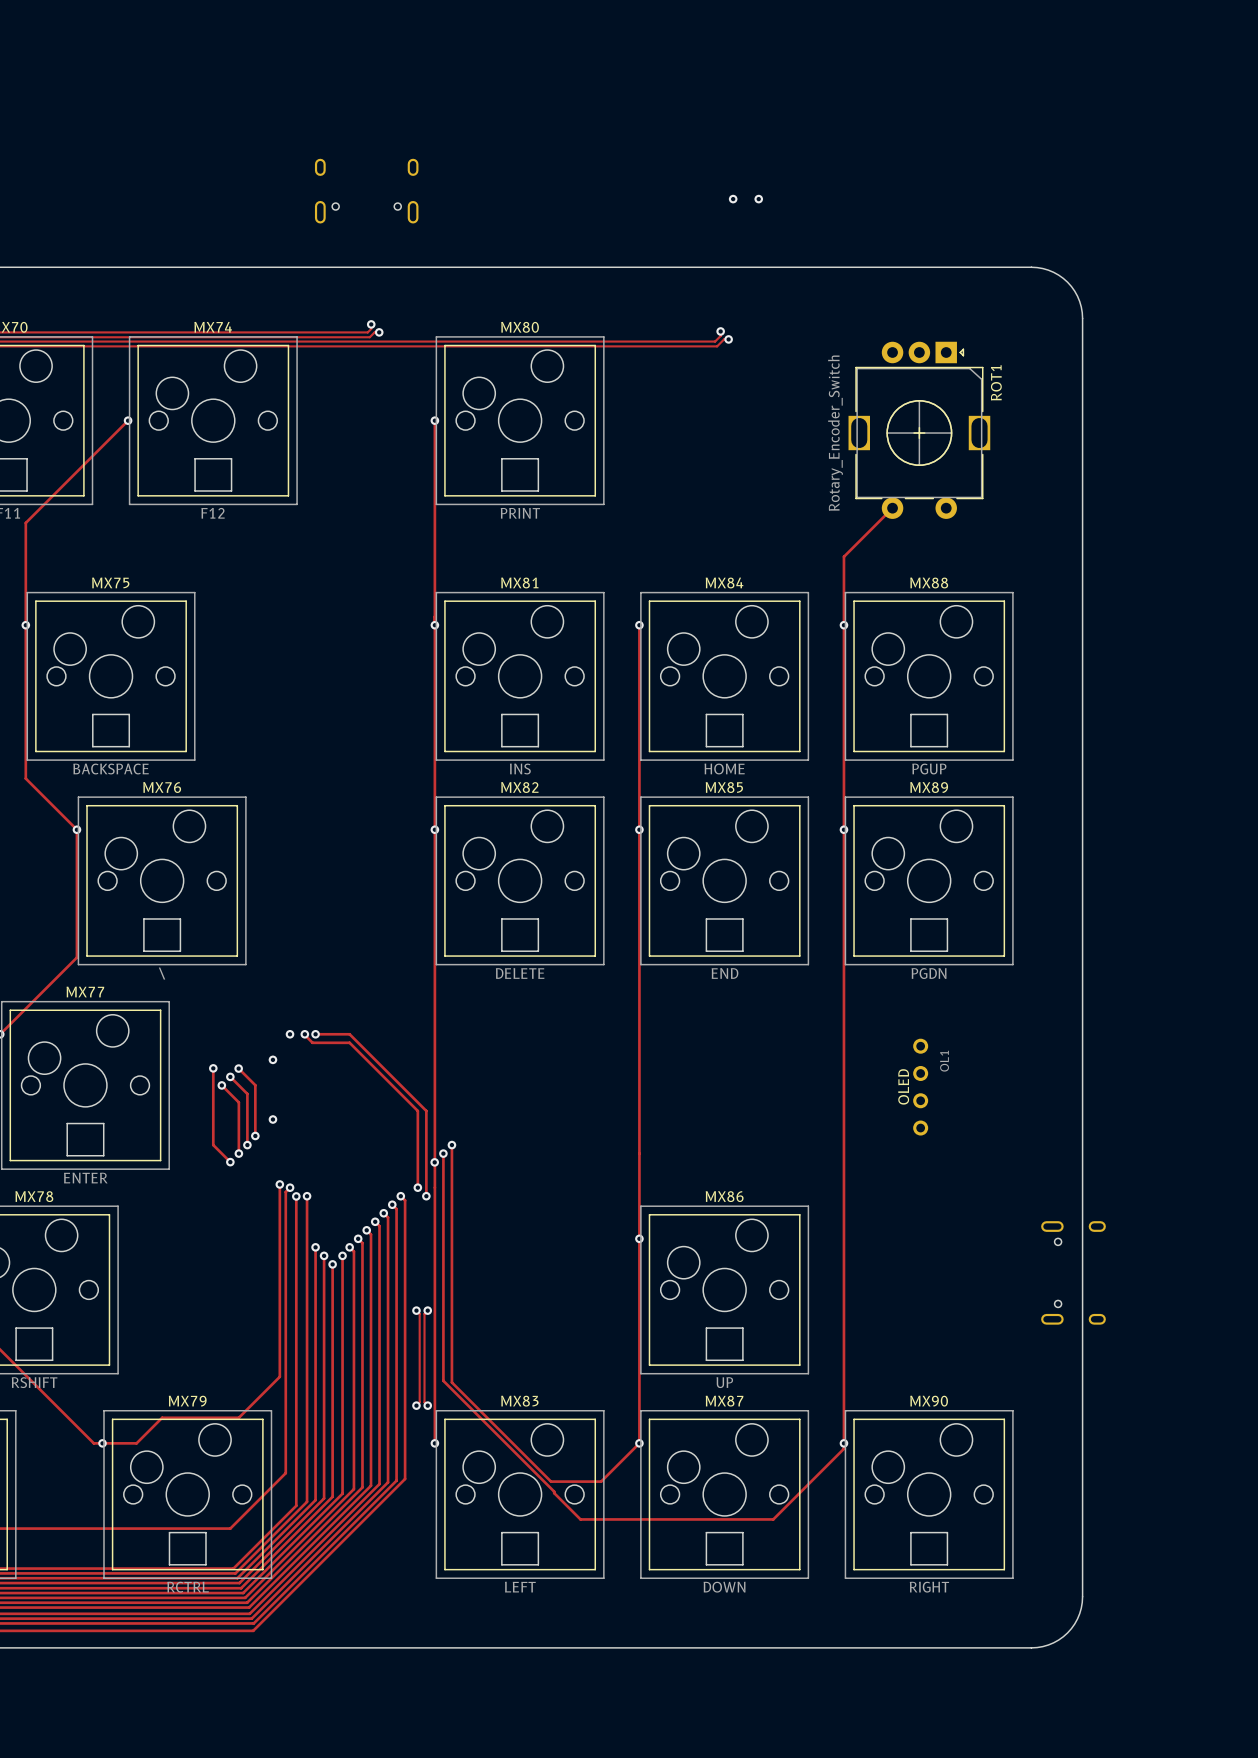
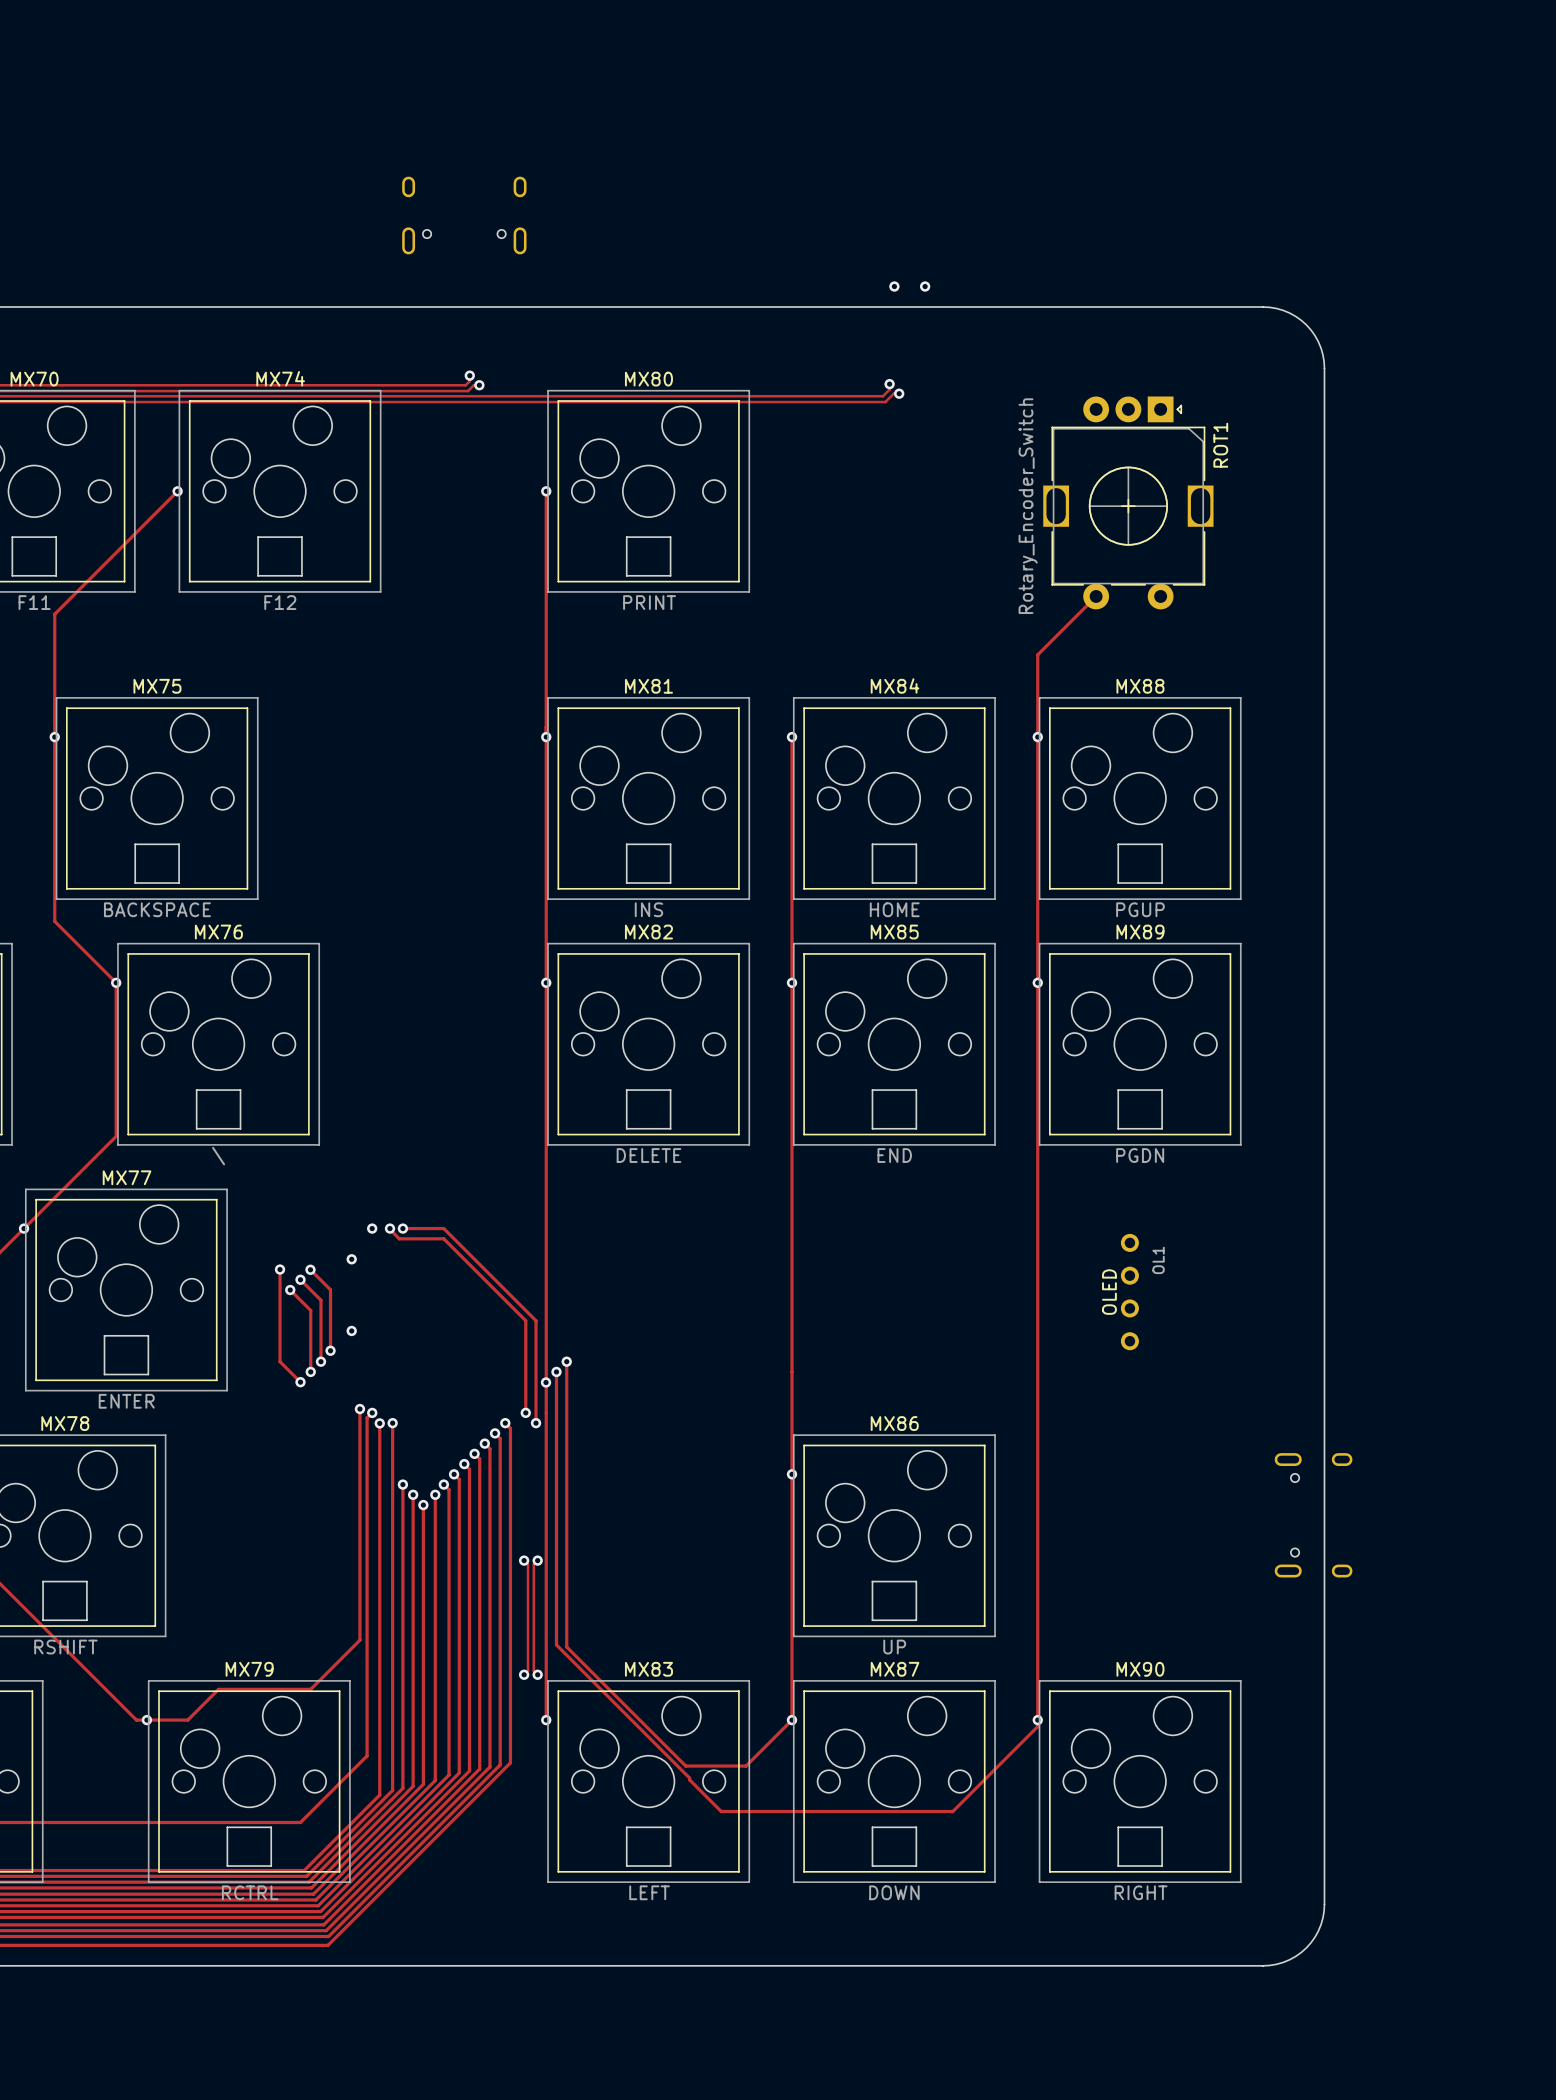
via: (733, 199) -> none
via: (758, 199) -> none
via: none -> (894, 286)
via: none -> (925, 286)

